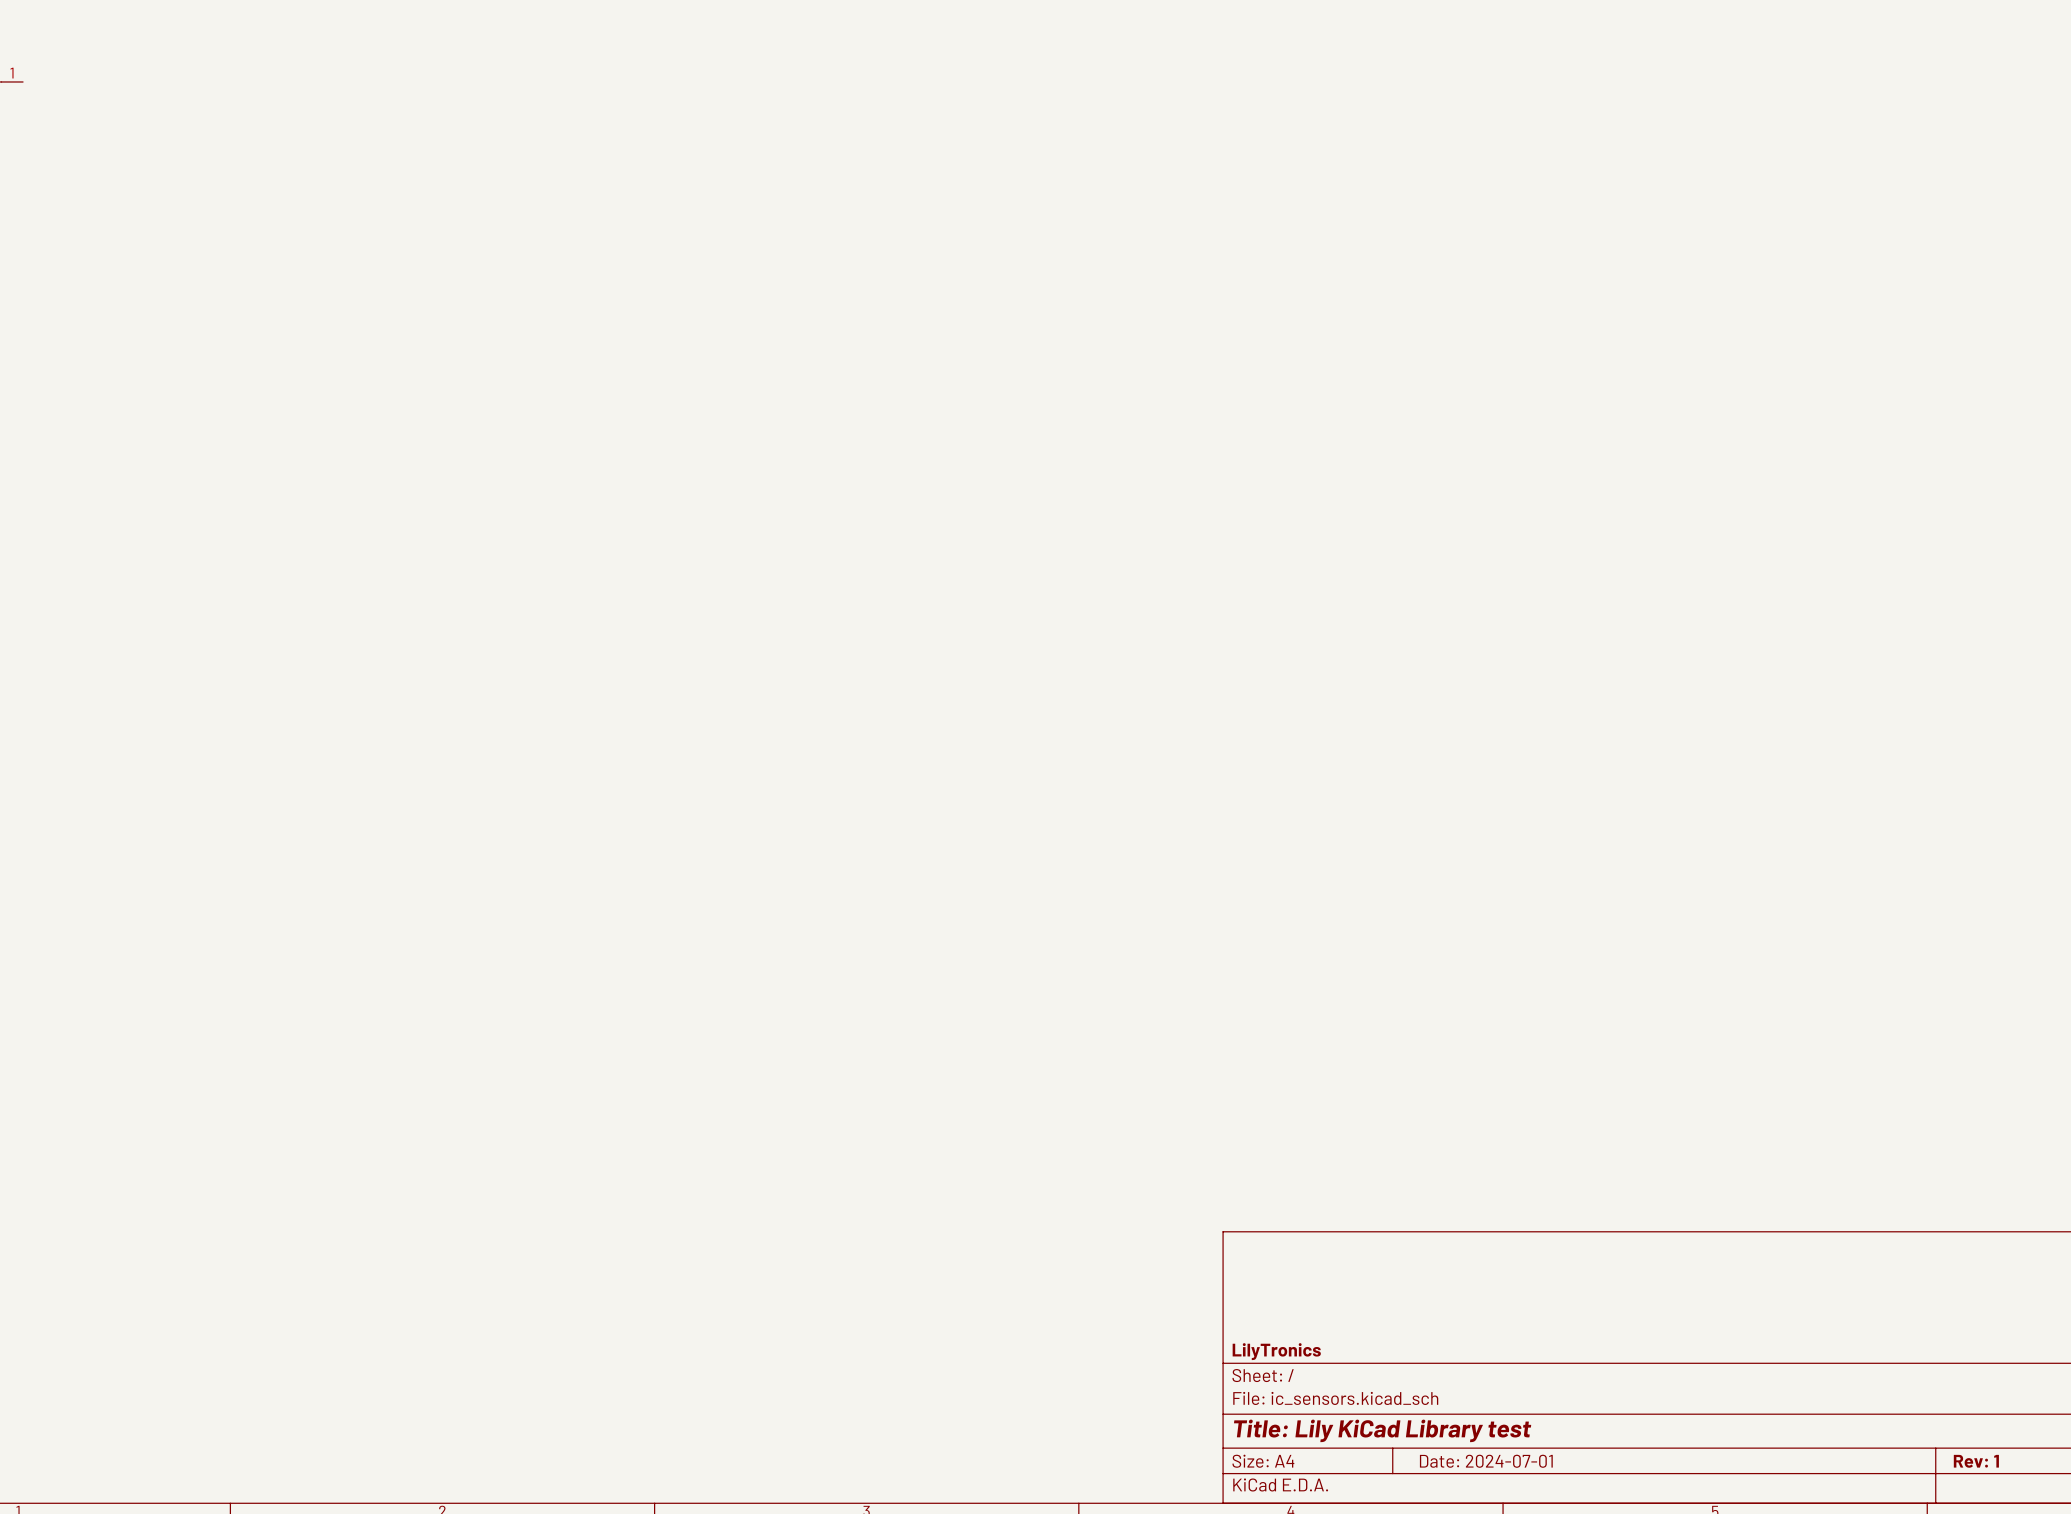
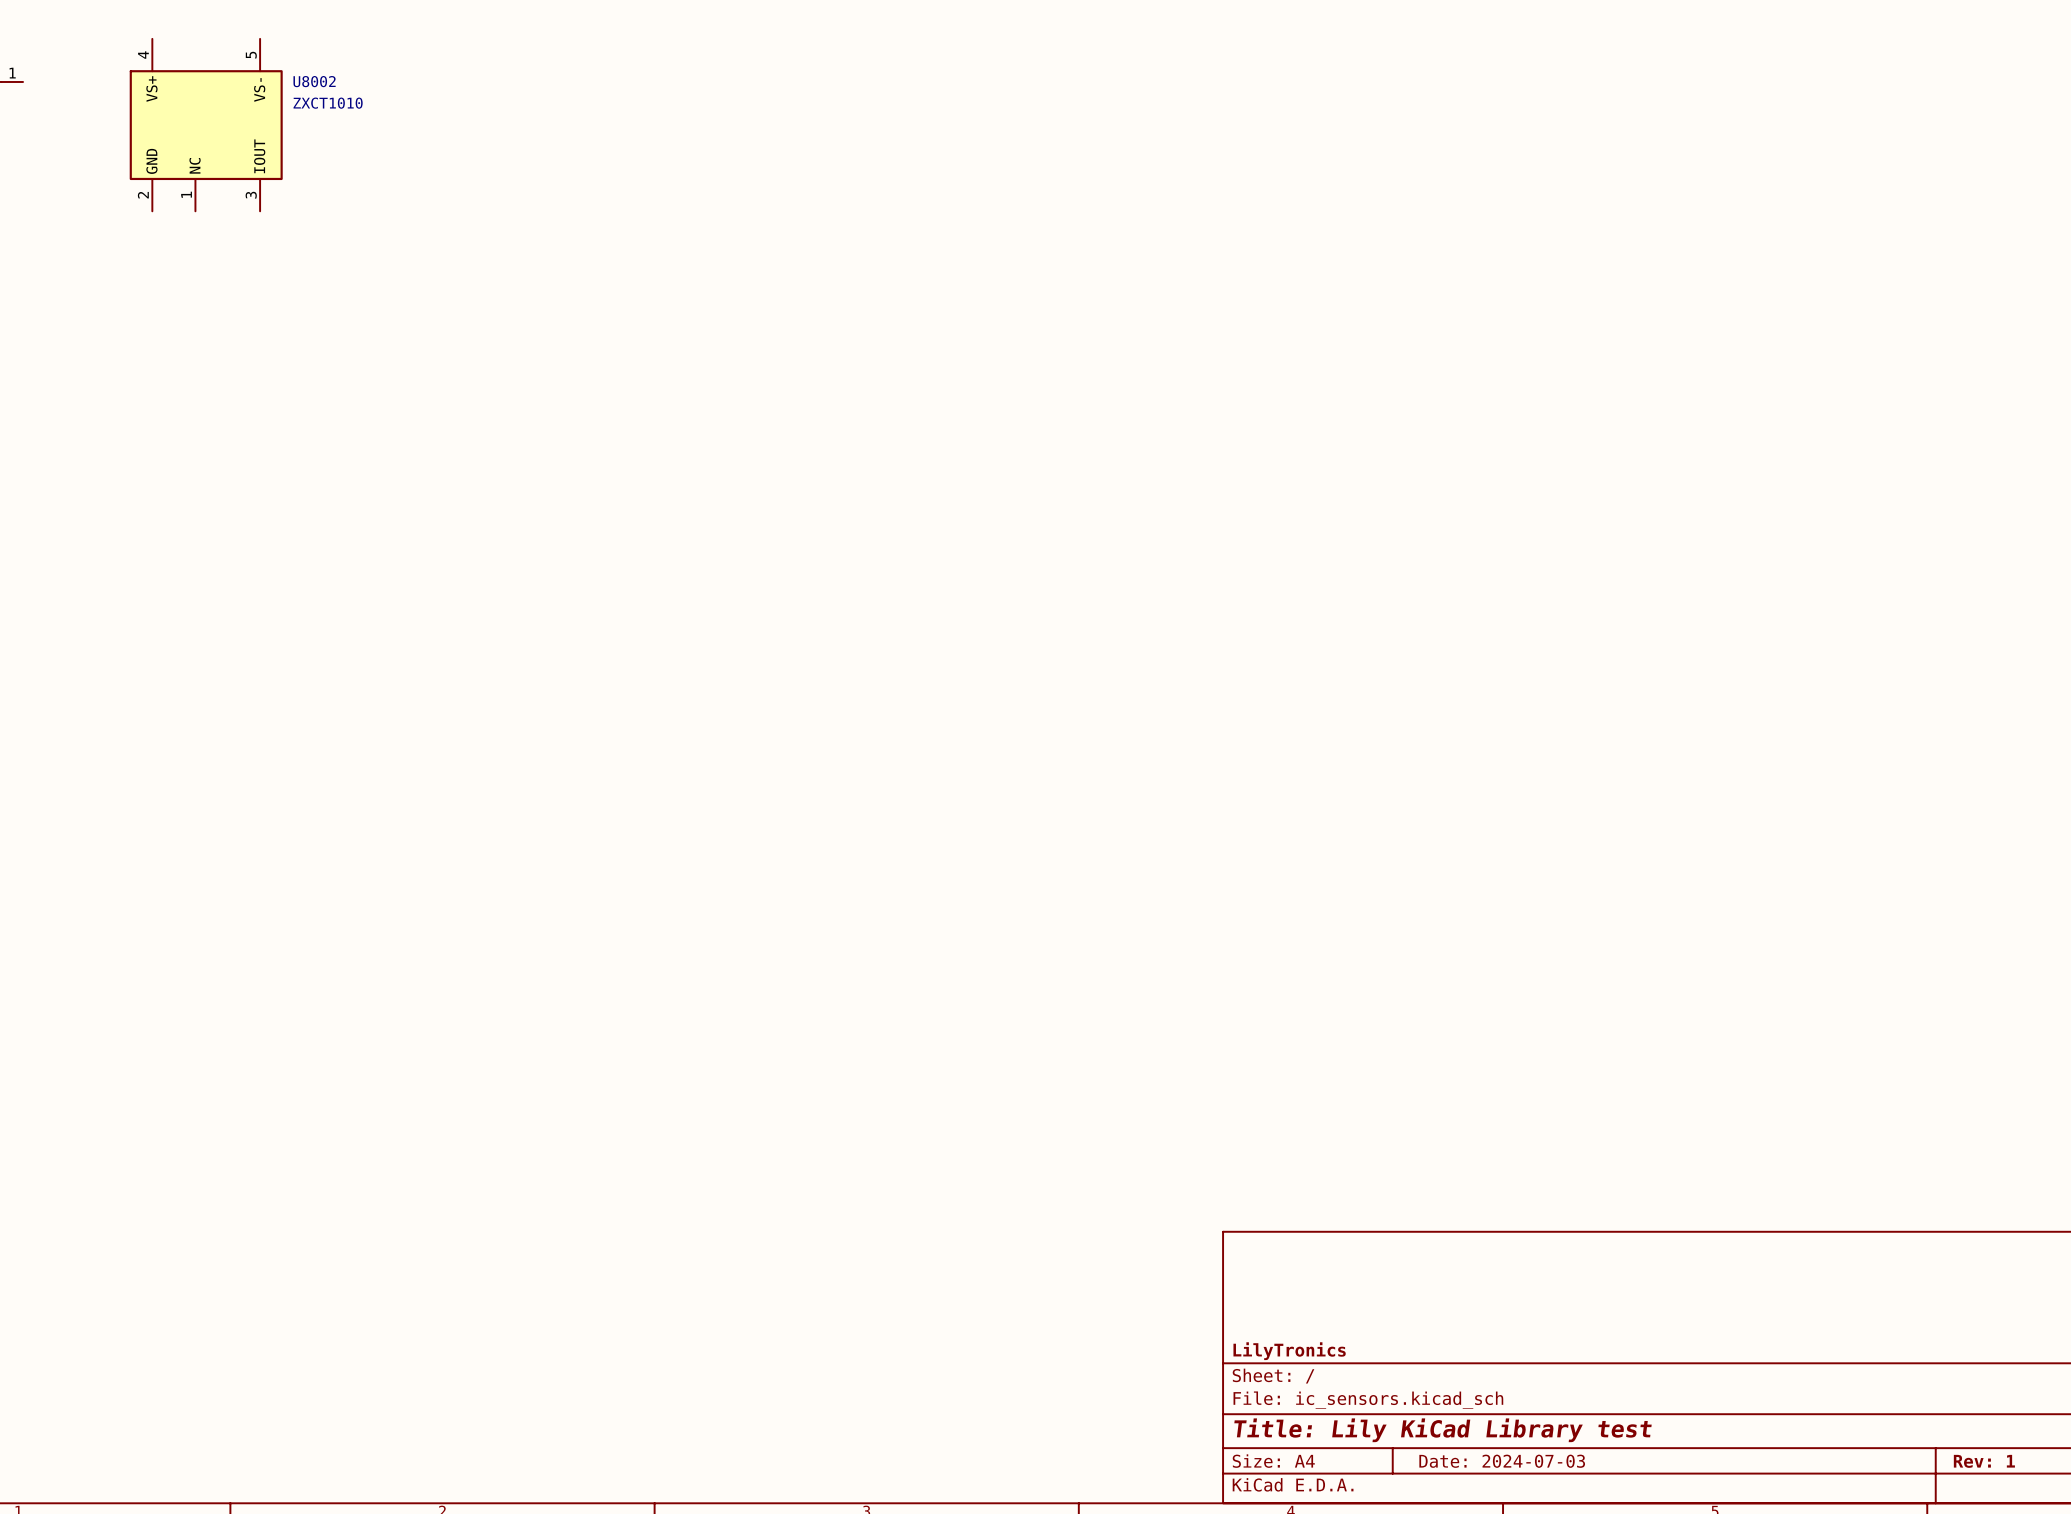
U8002: none -> ZXCT1010 (206, 125)
title block: Date: 2024-07-01 (1486, 1461) -> Date: 2024-07-03 (1502, 1461)

